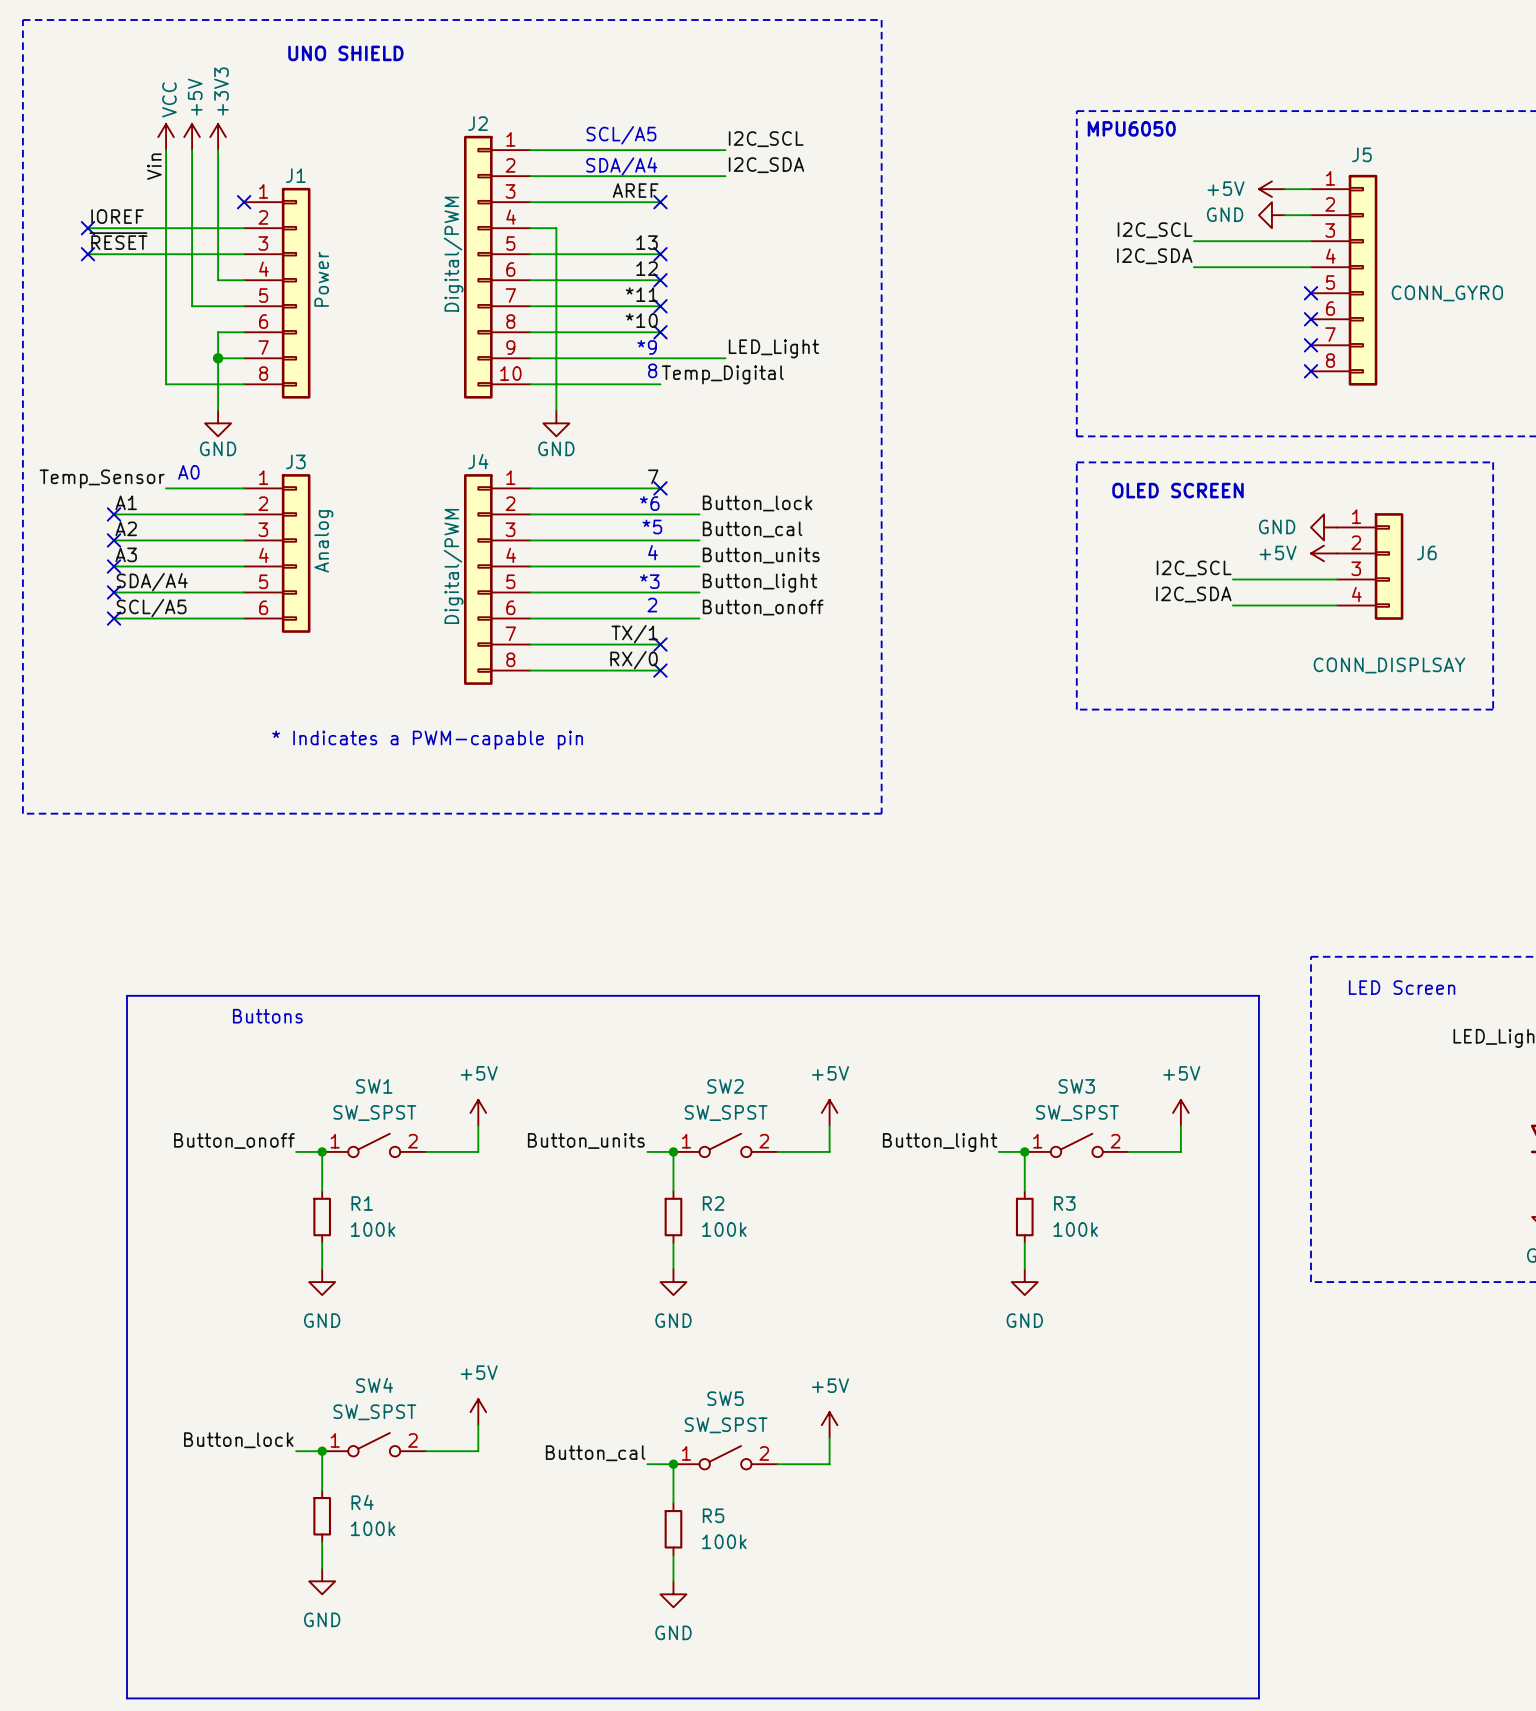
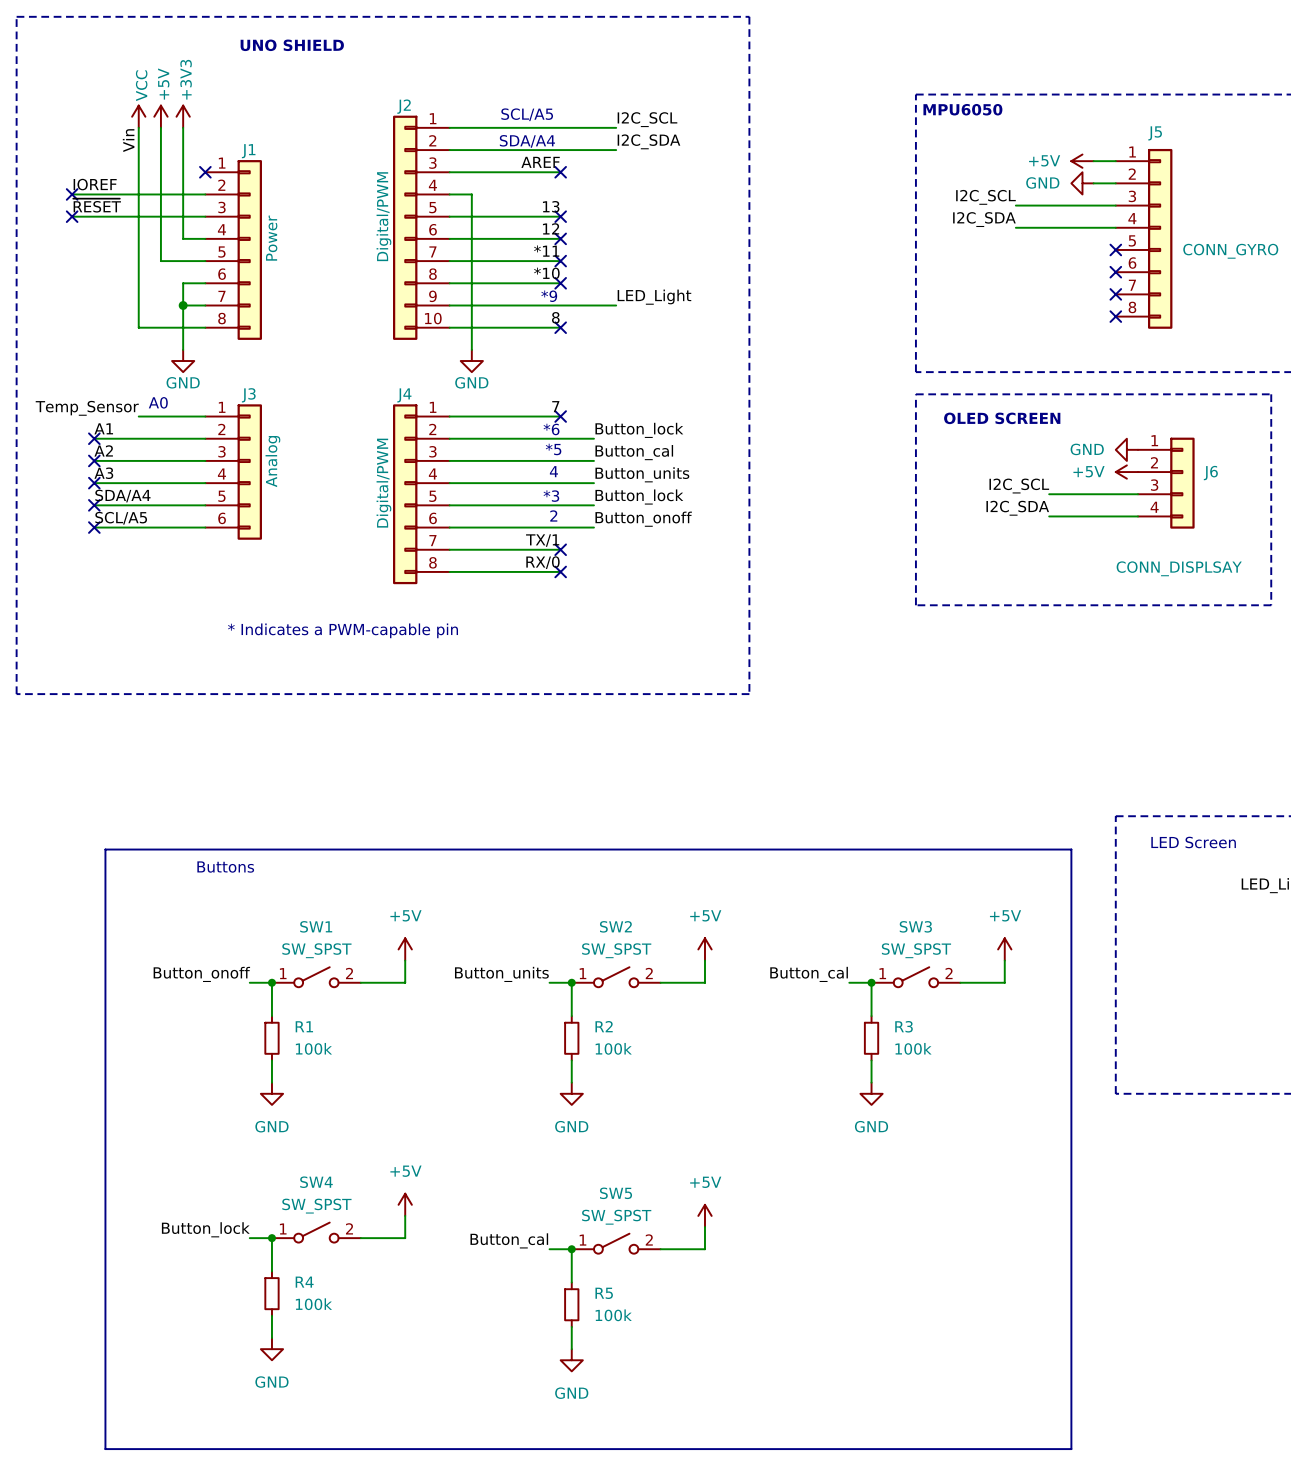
text: 8 (652, 370) -> none
label: Temp_Digital (722, 374) -> 8 (555, 317)
no-connect mark: none -> (560, 327)
label: Button_light (760, 583) -> Button_lock (639, 497)
label: Button_light (940, 1142) -> Button_cal (809, 974)

